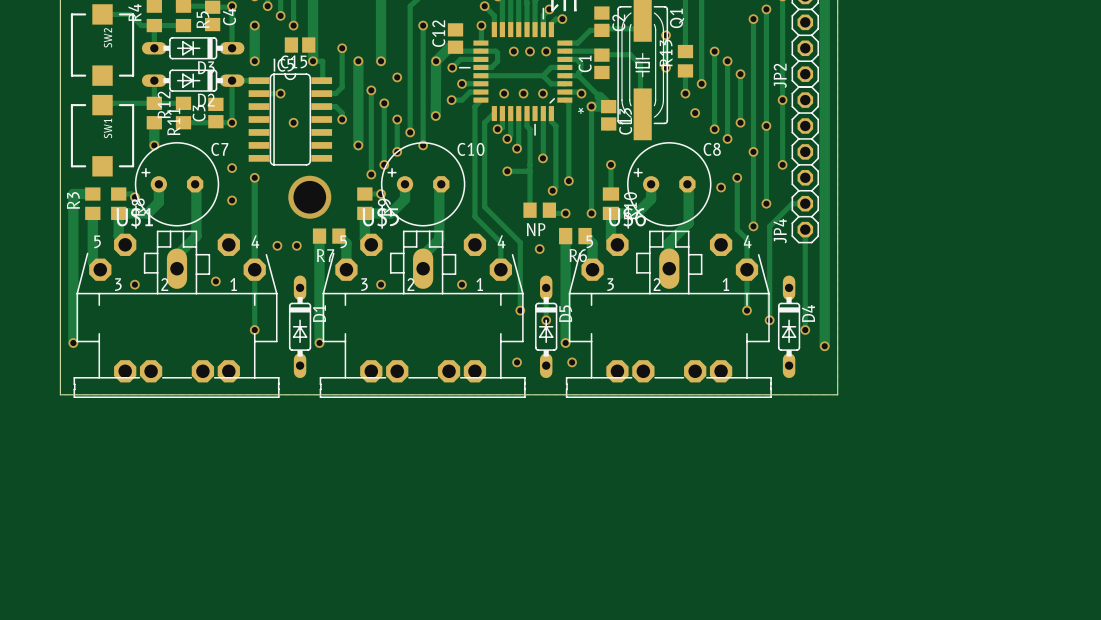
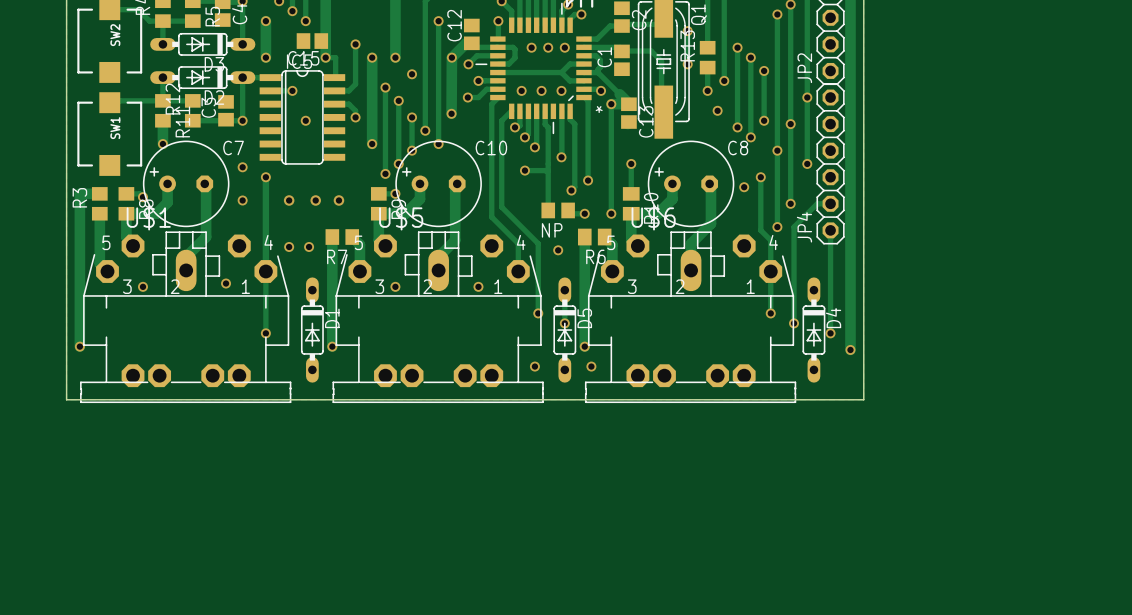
via size: [288, 175, 332, 219] -> [310, 195, 321, 206]
via: none -> (289, 200)
via: none -> (338, 200)

